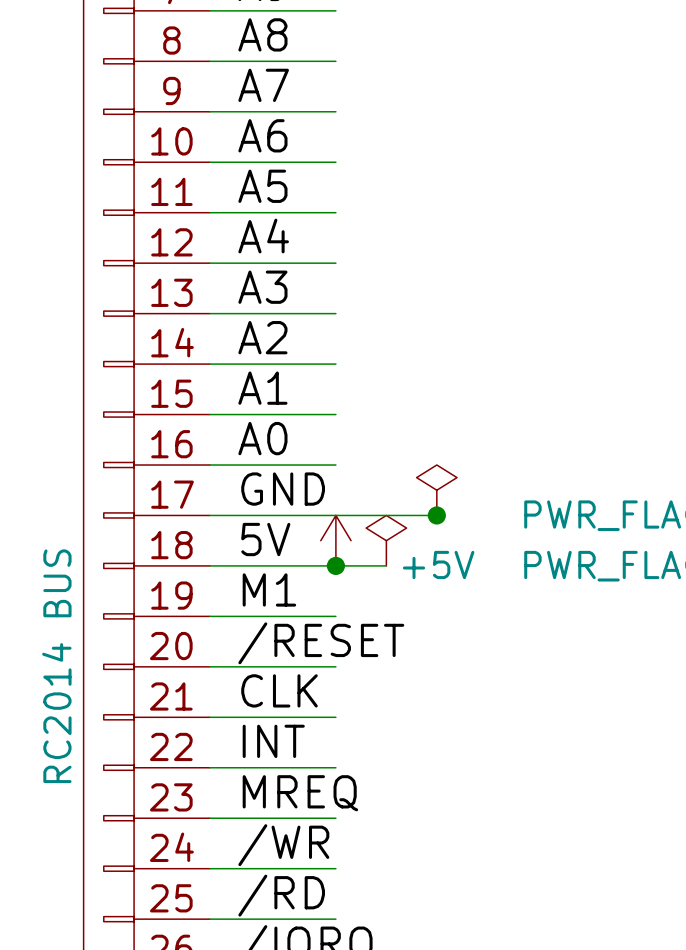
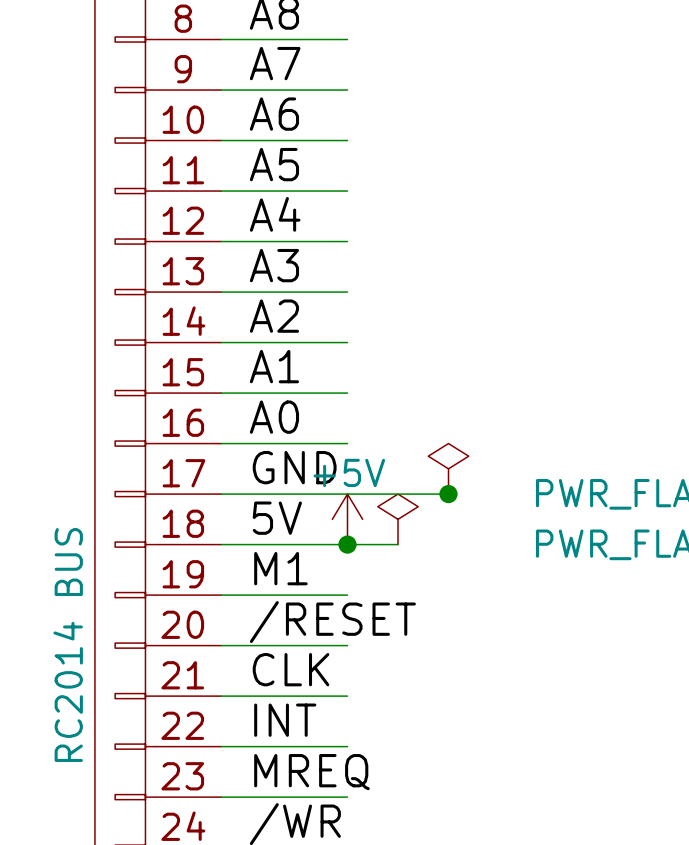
power symbol text position: +5V (438, 564) -> +5V (349, 472)

